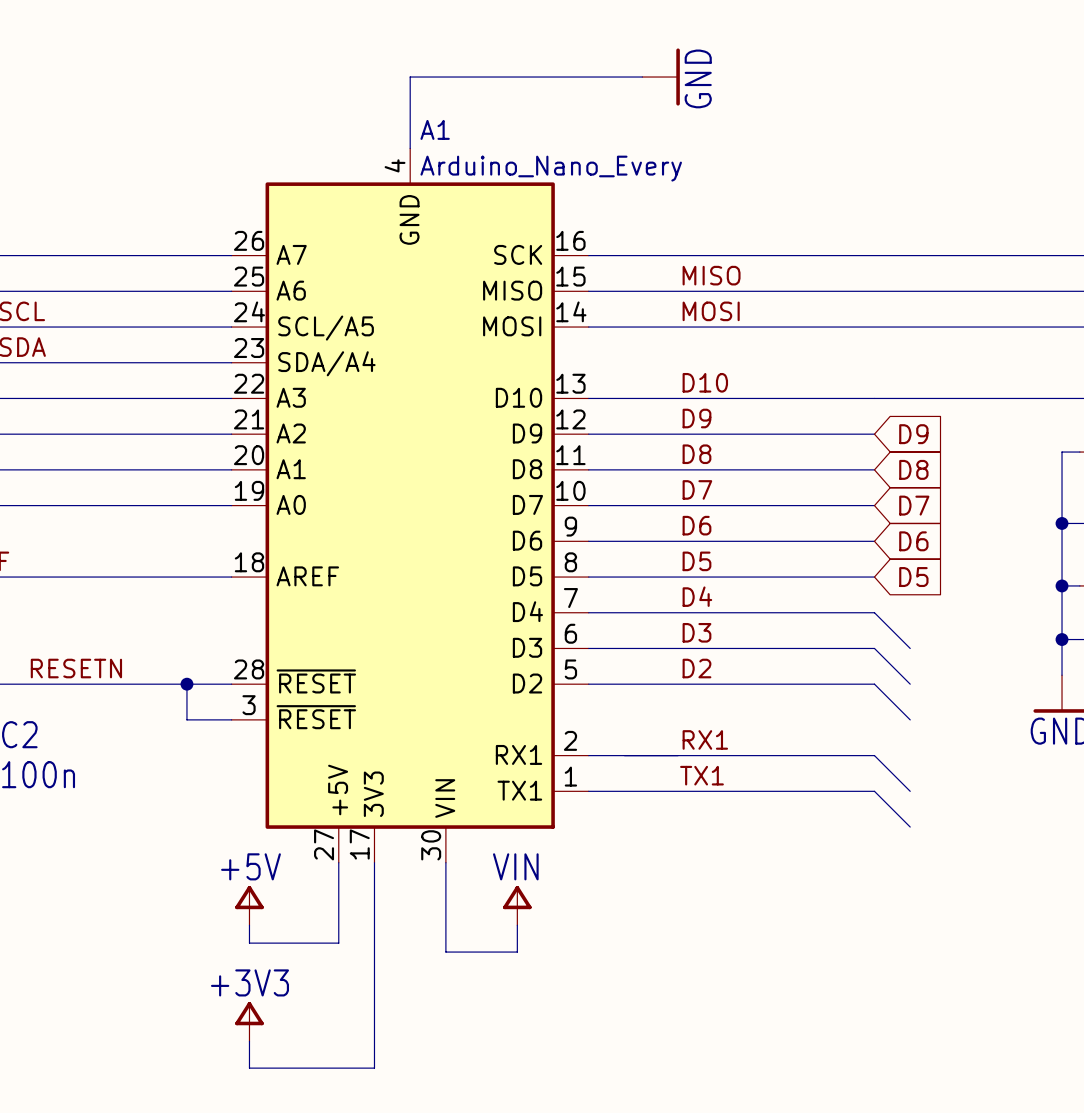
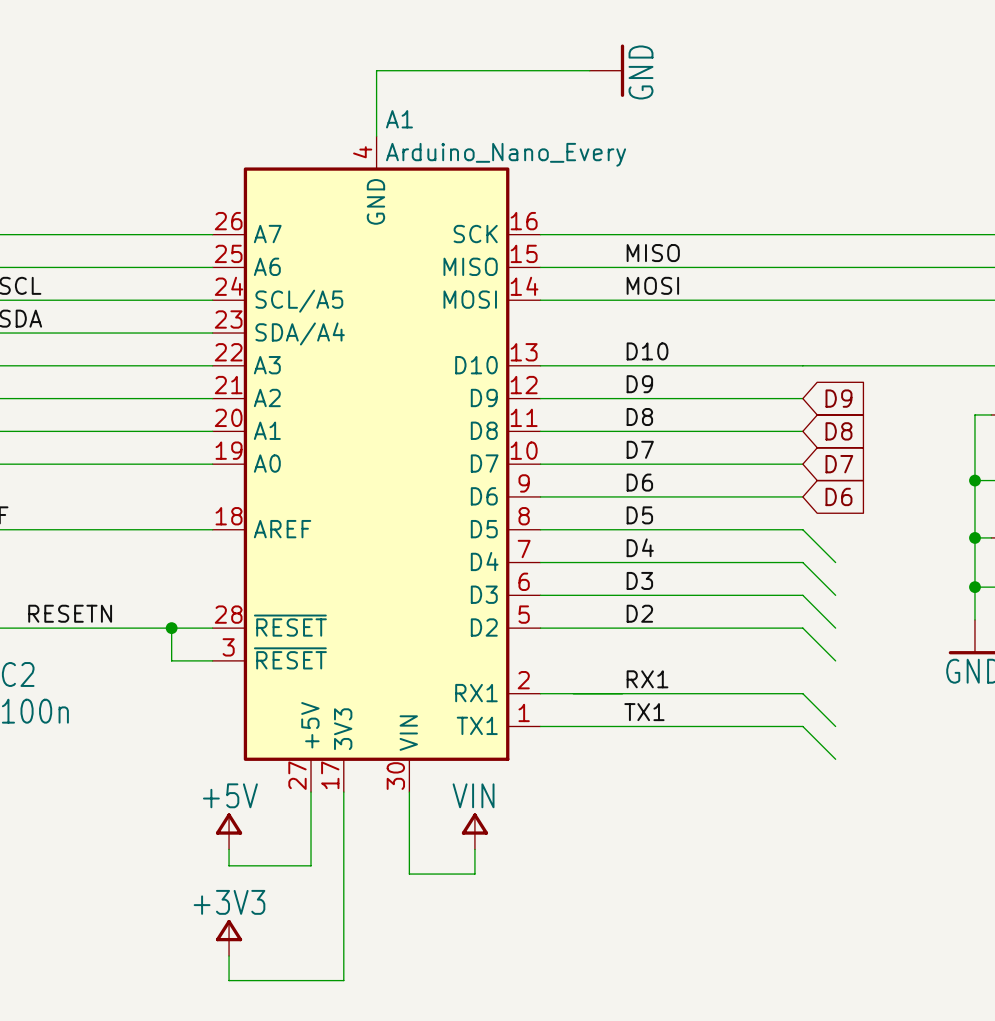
wire: none -> (802, 529) (835, 562)
global label: D5~{} (913, 577) -> none

